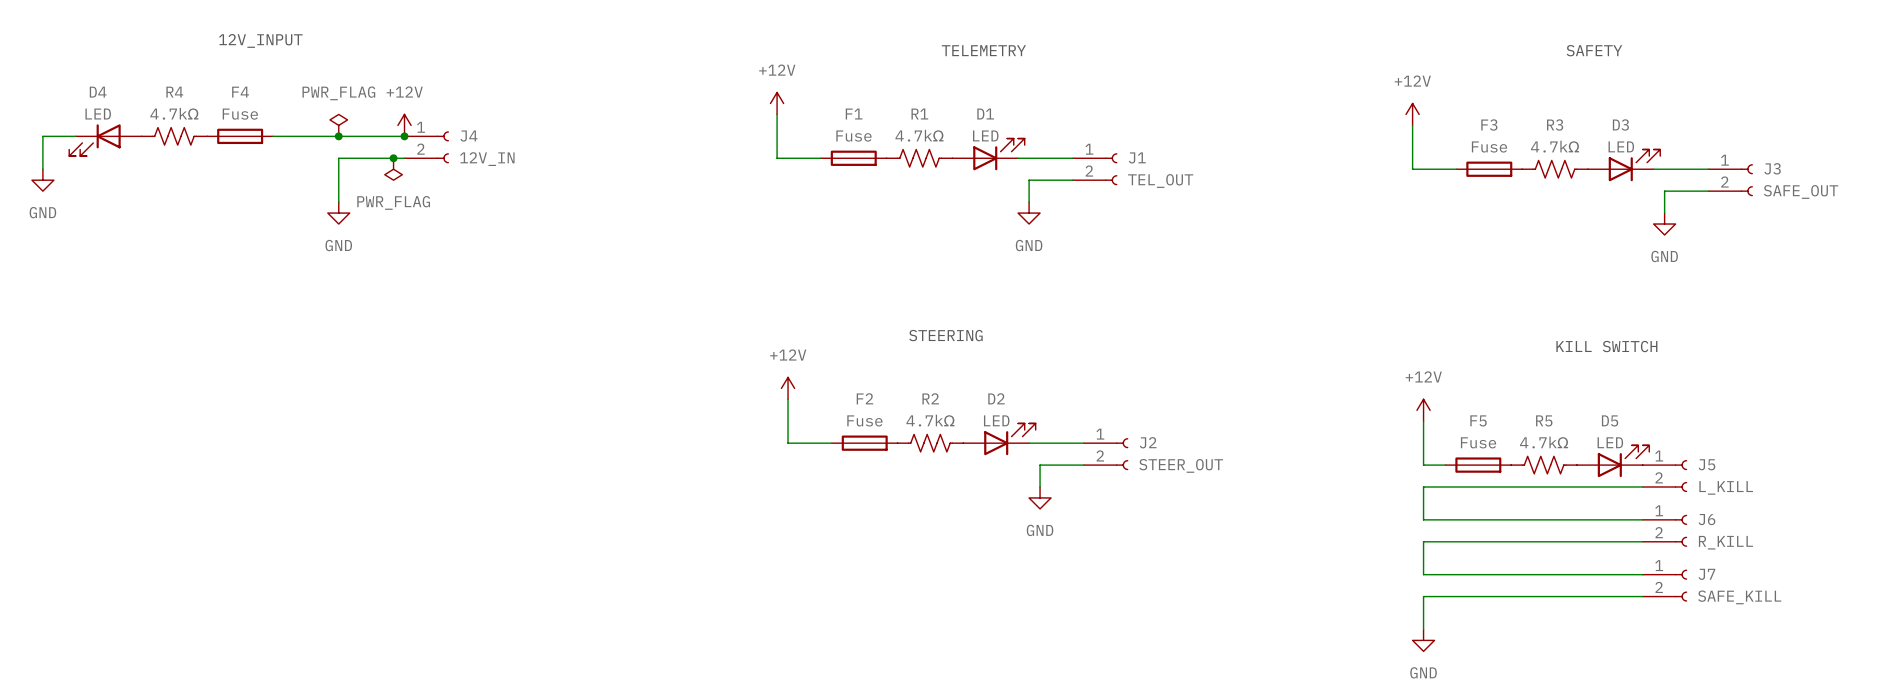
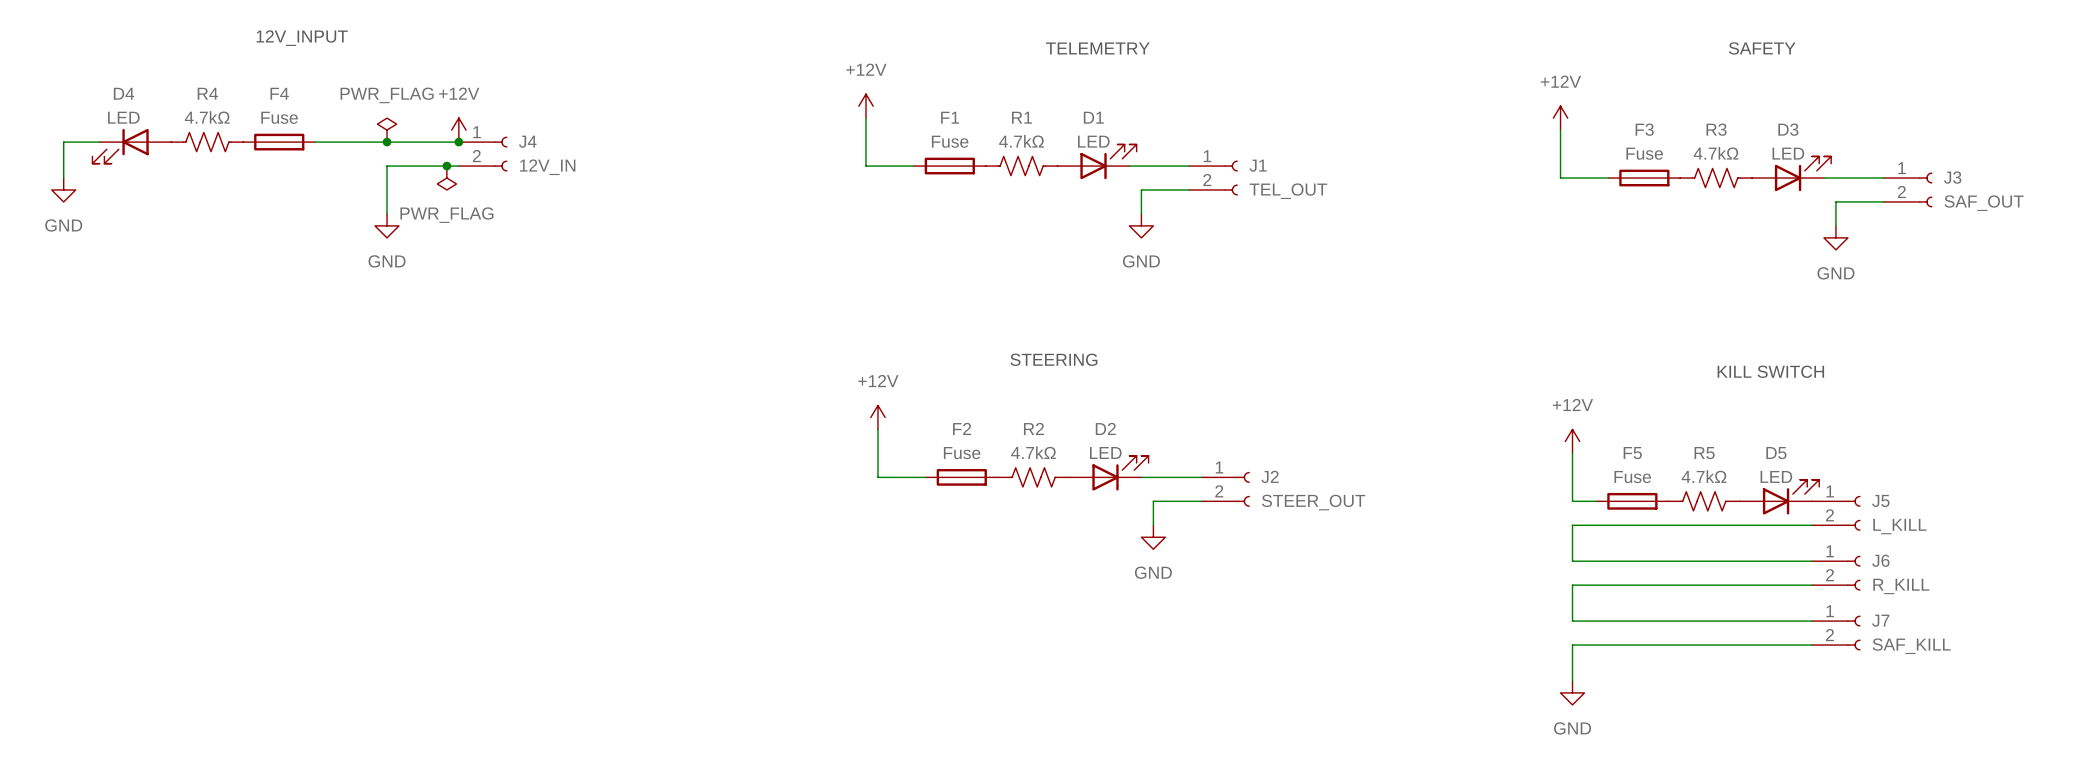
J3 value: SAFE_OUT (1801, 191) -> SAF_OUT (1984, 203)
J7 value: SAFE_KILL (1739, 597) -> SAF_KILL (1911, 646)

